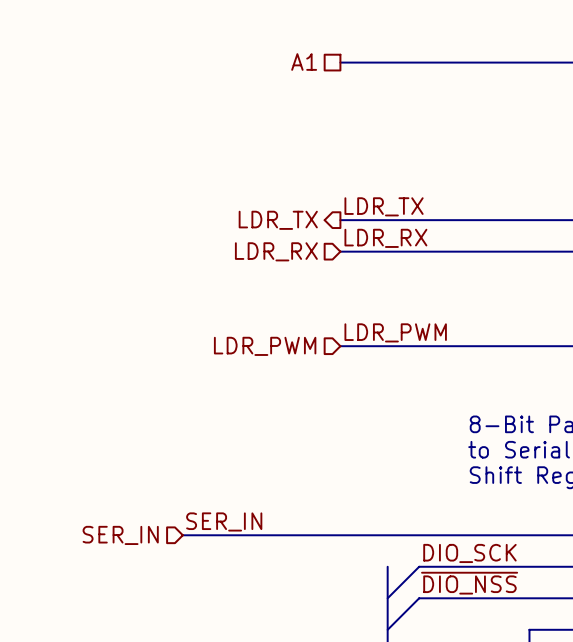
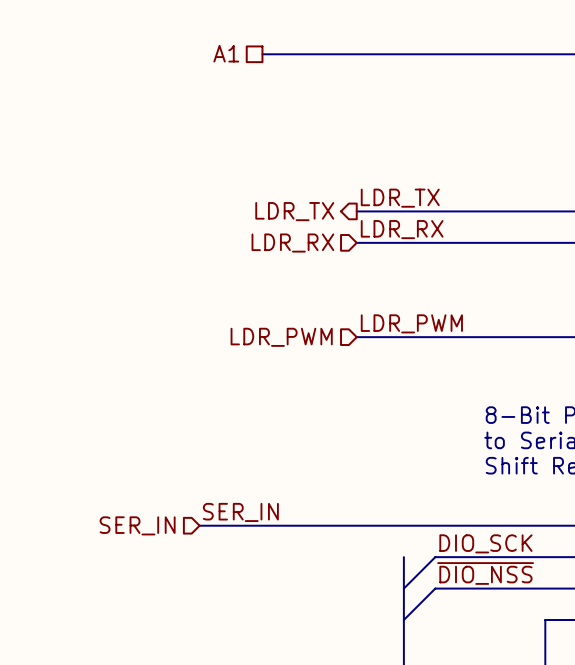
hierarchical label position: A1 (304, 61) -> A1 (226, 53)
wire: none -> (262, 54) (356, 54)

